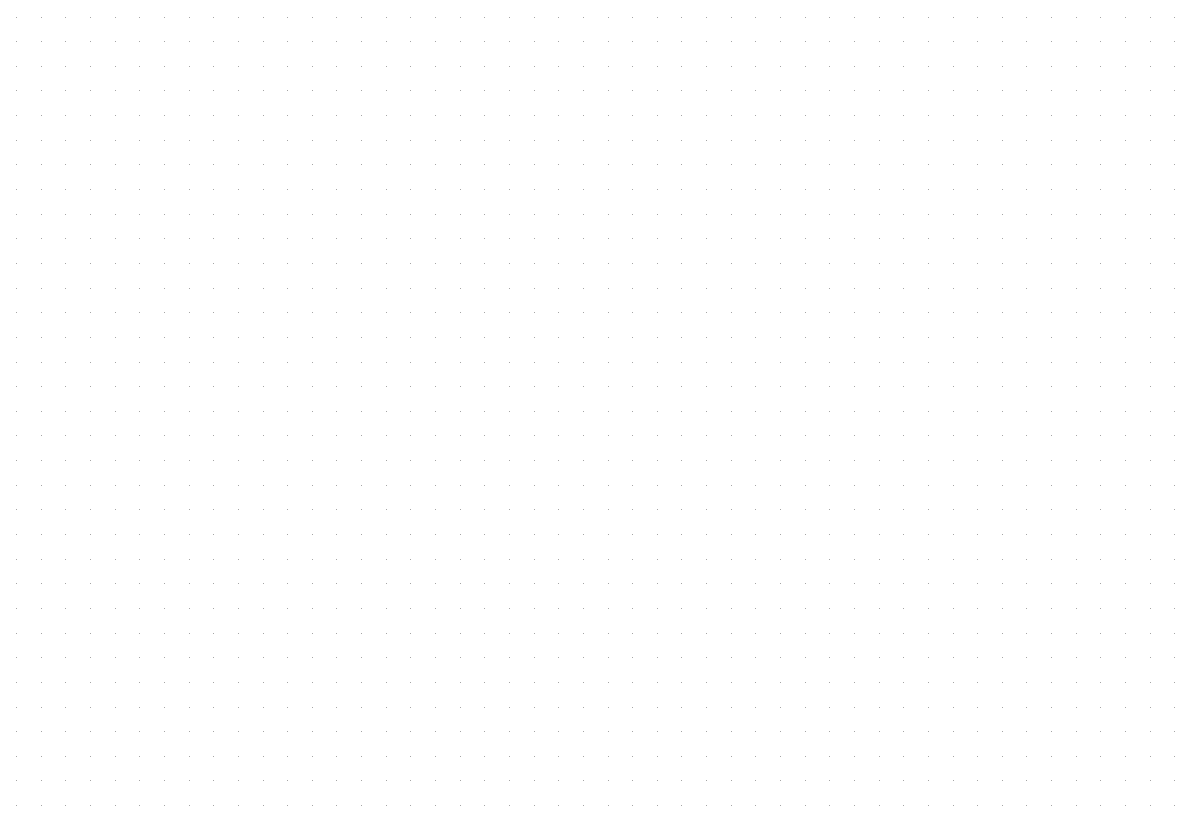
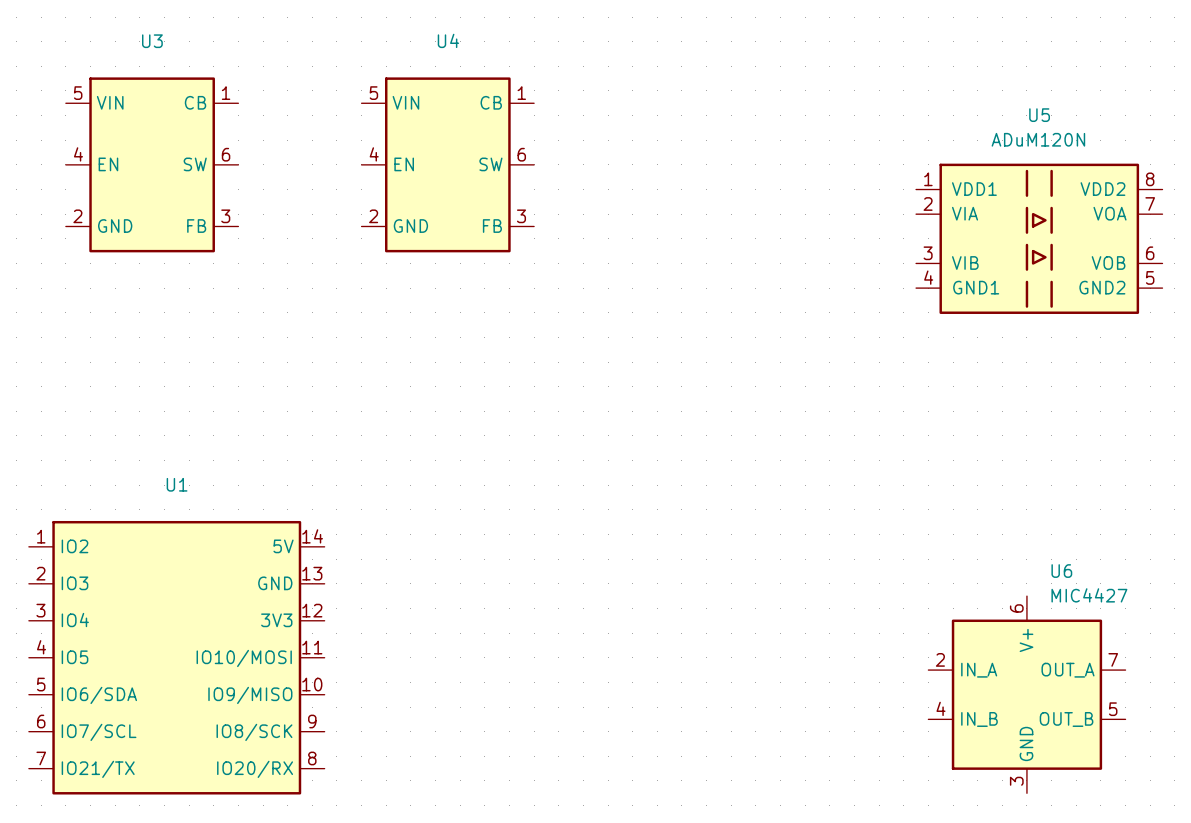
U3: none -> (152, 164)
U4: none -> (447, 164)
U5: none -> ADuM120N (1039, 238)
U1: none -> (176, 657)
U6: none -> MIC4427 (1026, 694)

